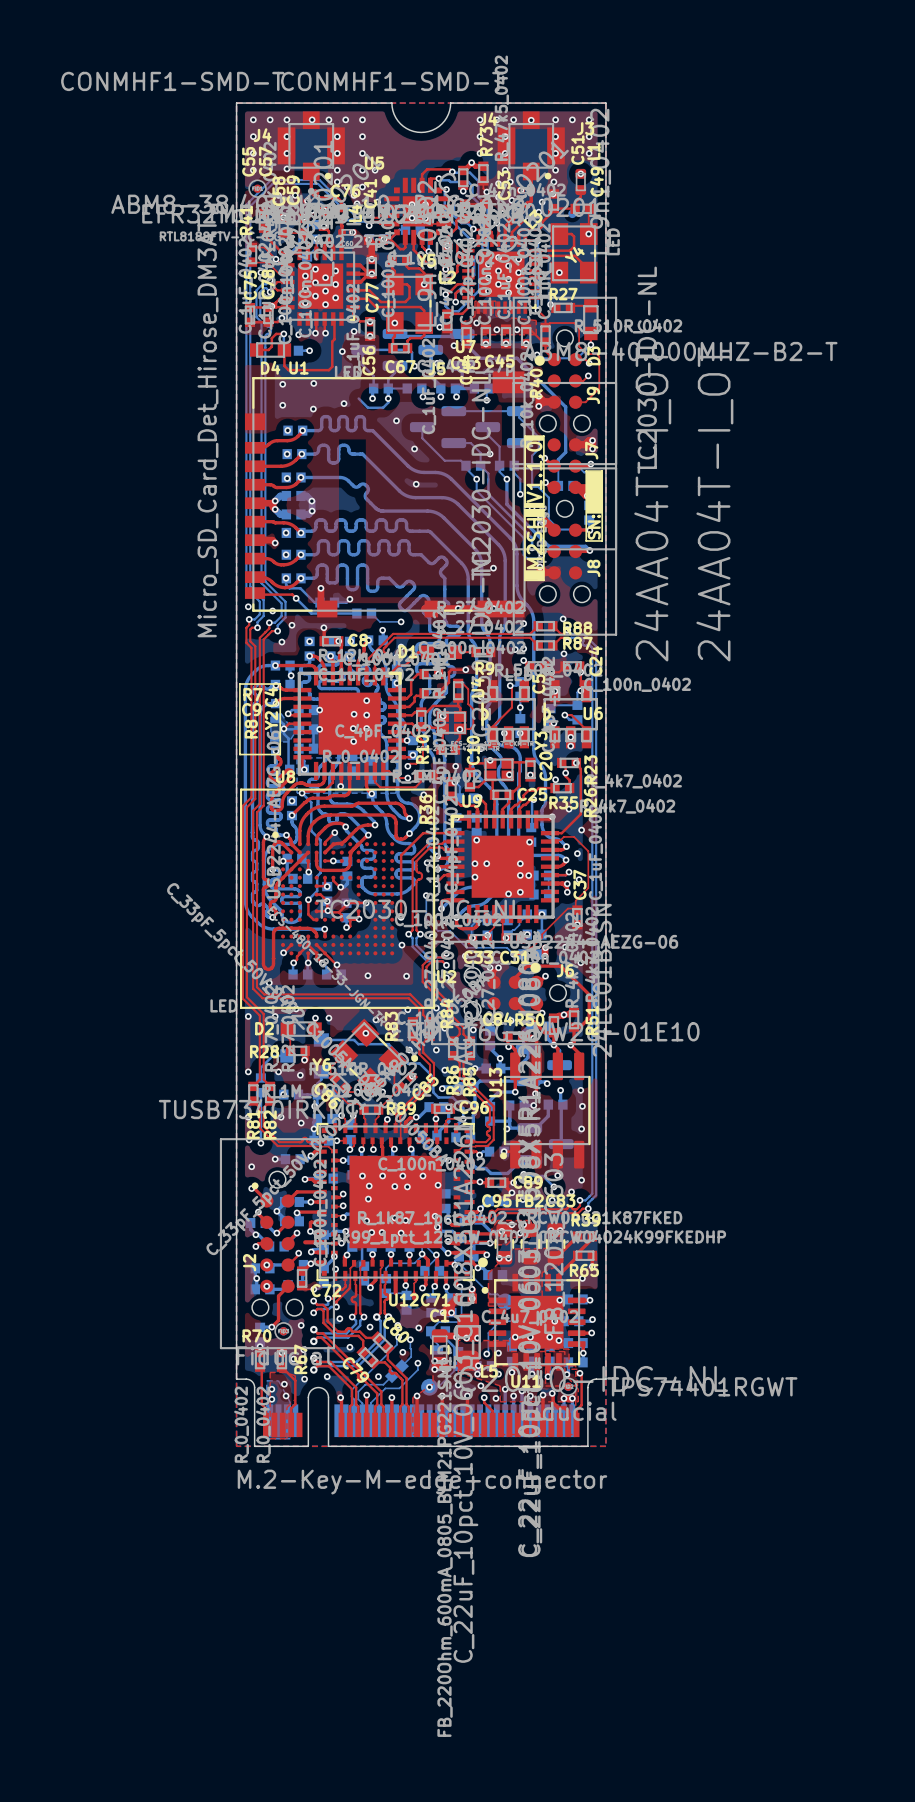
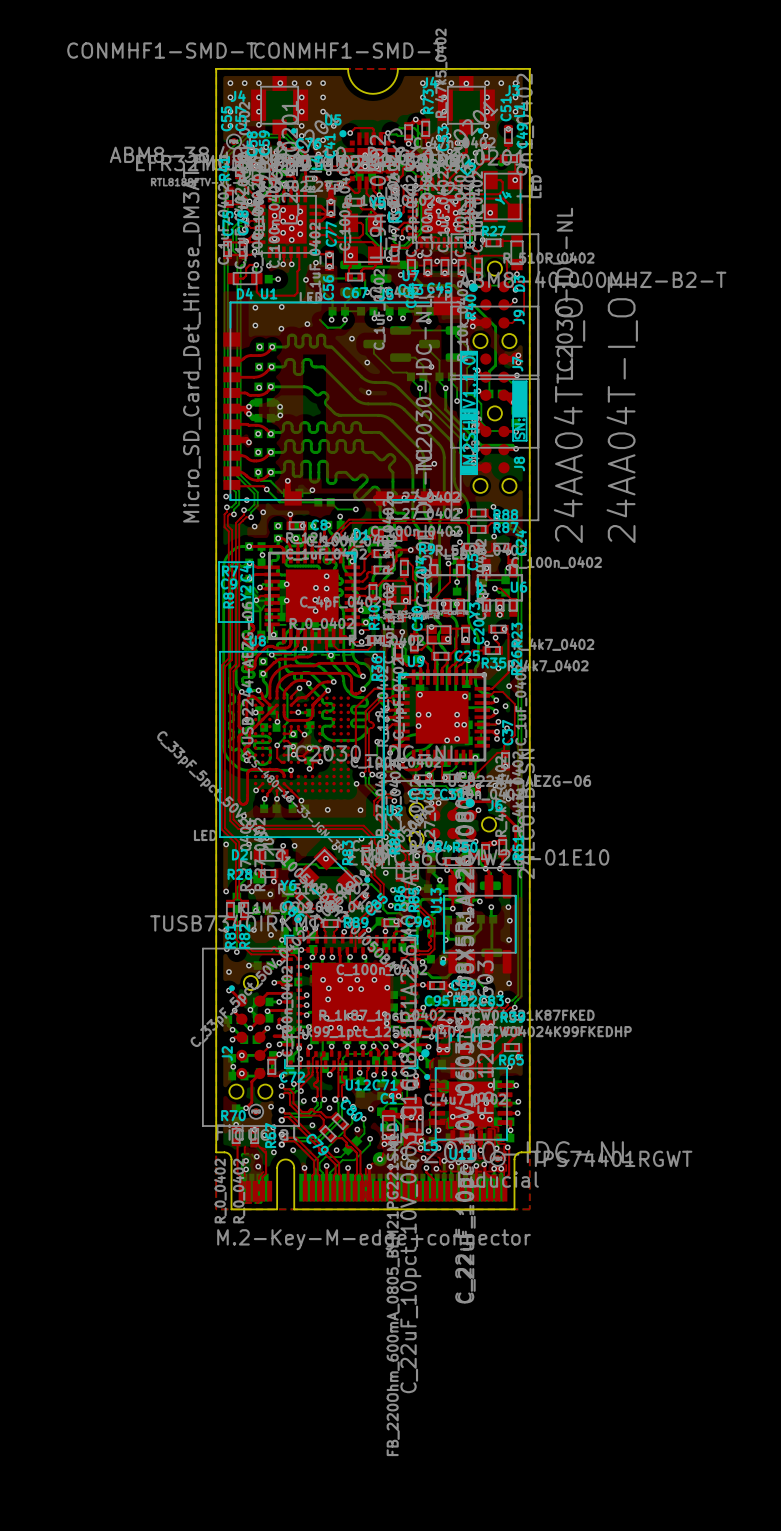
bottom track: none -> (417, 122) (417, 147) (421, 150) (421, 232) (405, 248) (381, 248) (366, 233) (366, 219) (377, 205)
top track: (452, 171) (449, 169) (427, 169) (422, 174) -> (350, 133) (355, 128) (373, 129)
via: (452, 171) -> none
via: none -> (350, 133)
bottom track: (446, 189) (444, 191) (444, 213) (471, 240) -> none
via: (446, 189) -> none
via: (473, 228) -> none

